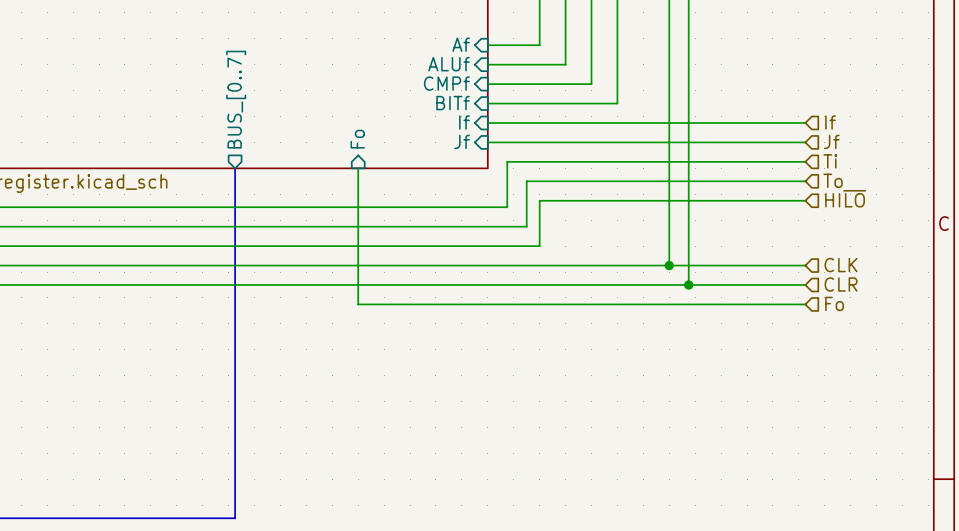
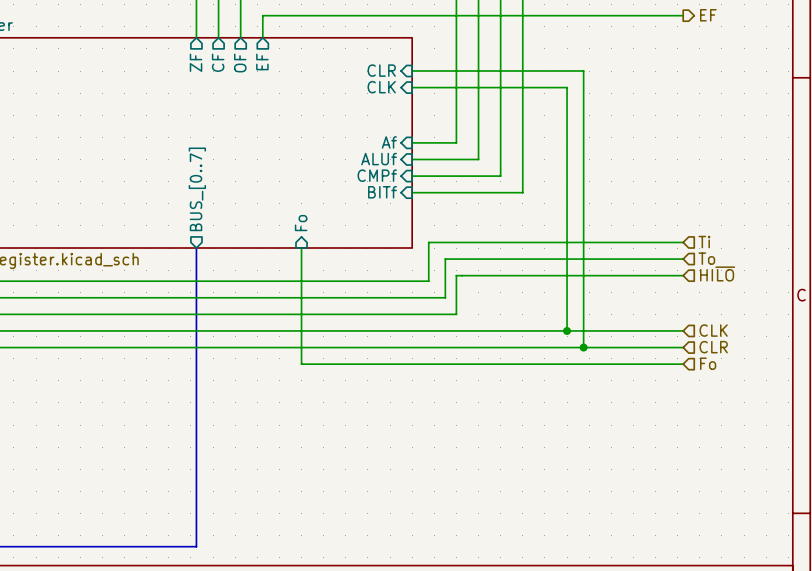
sheet pin: If (464, 122) -> none
wire: (487, 122) (805, 122) -> none
hierarchical label: If (830, 122) -> none
sheet pin: Jf (462, 141) -> none
hierarchical label: Jf (831, 141) -> none
wire: (487, 142) (805, 142) -> none

